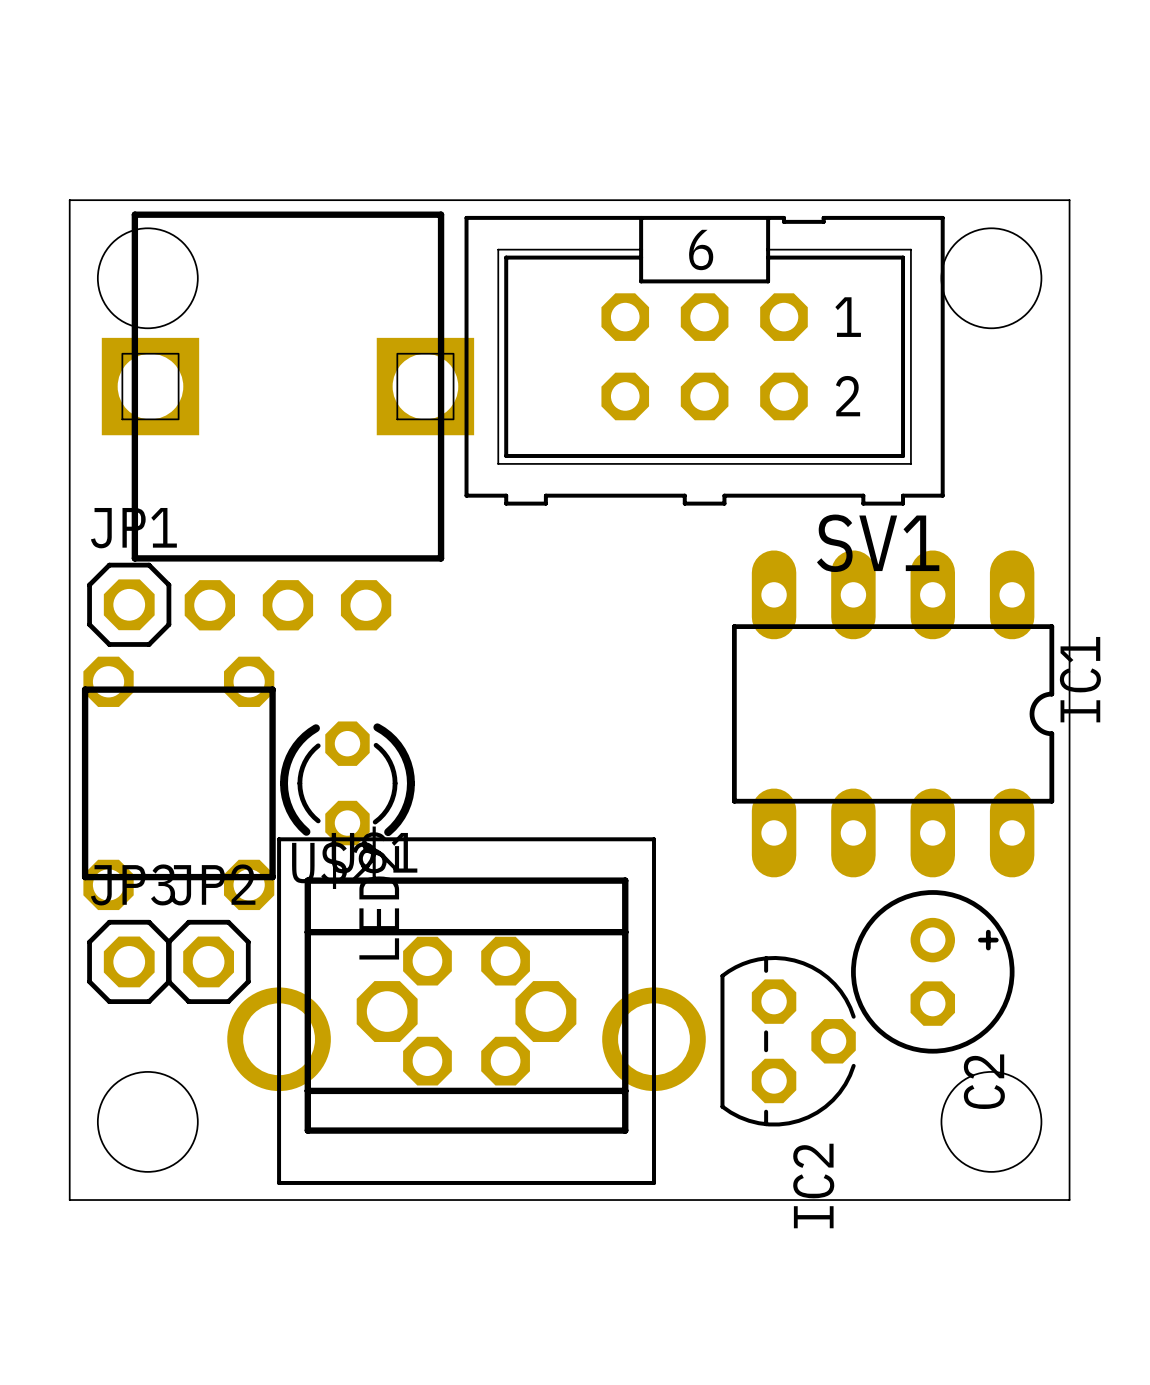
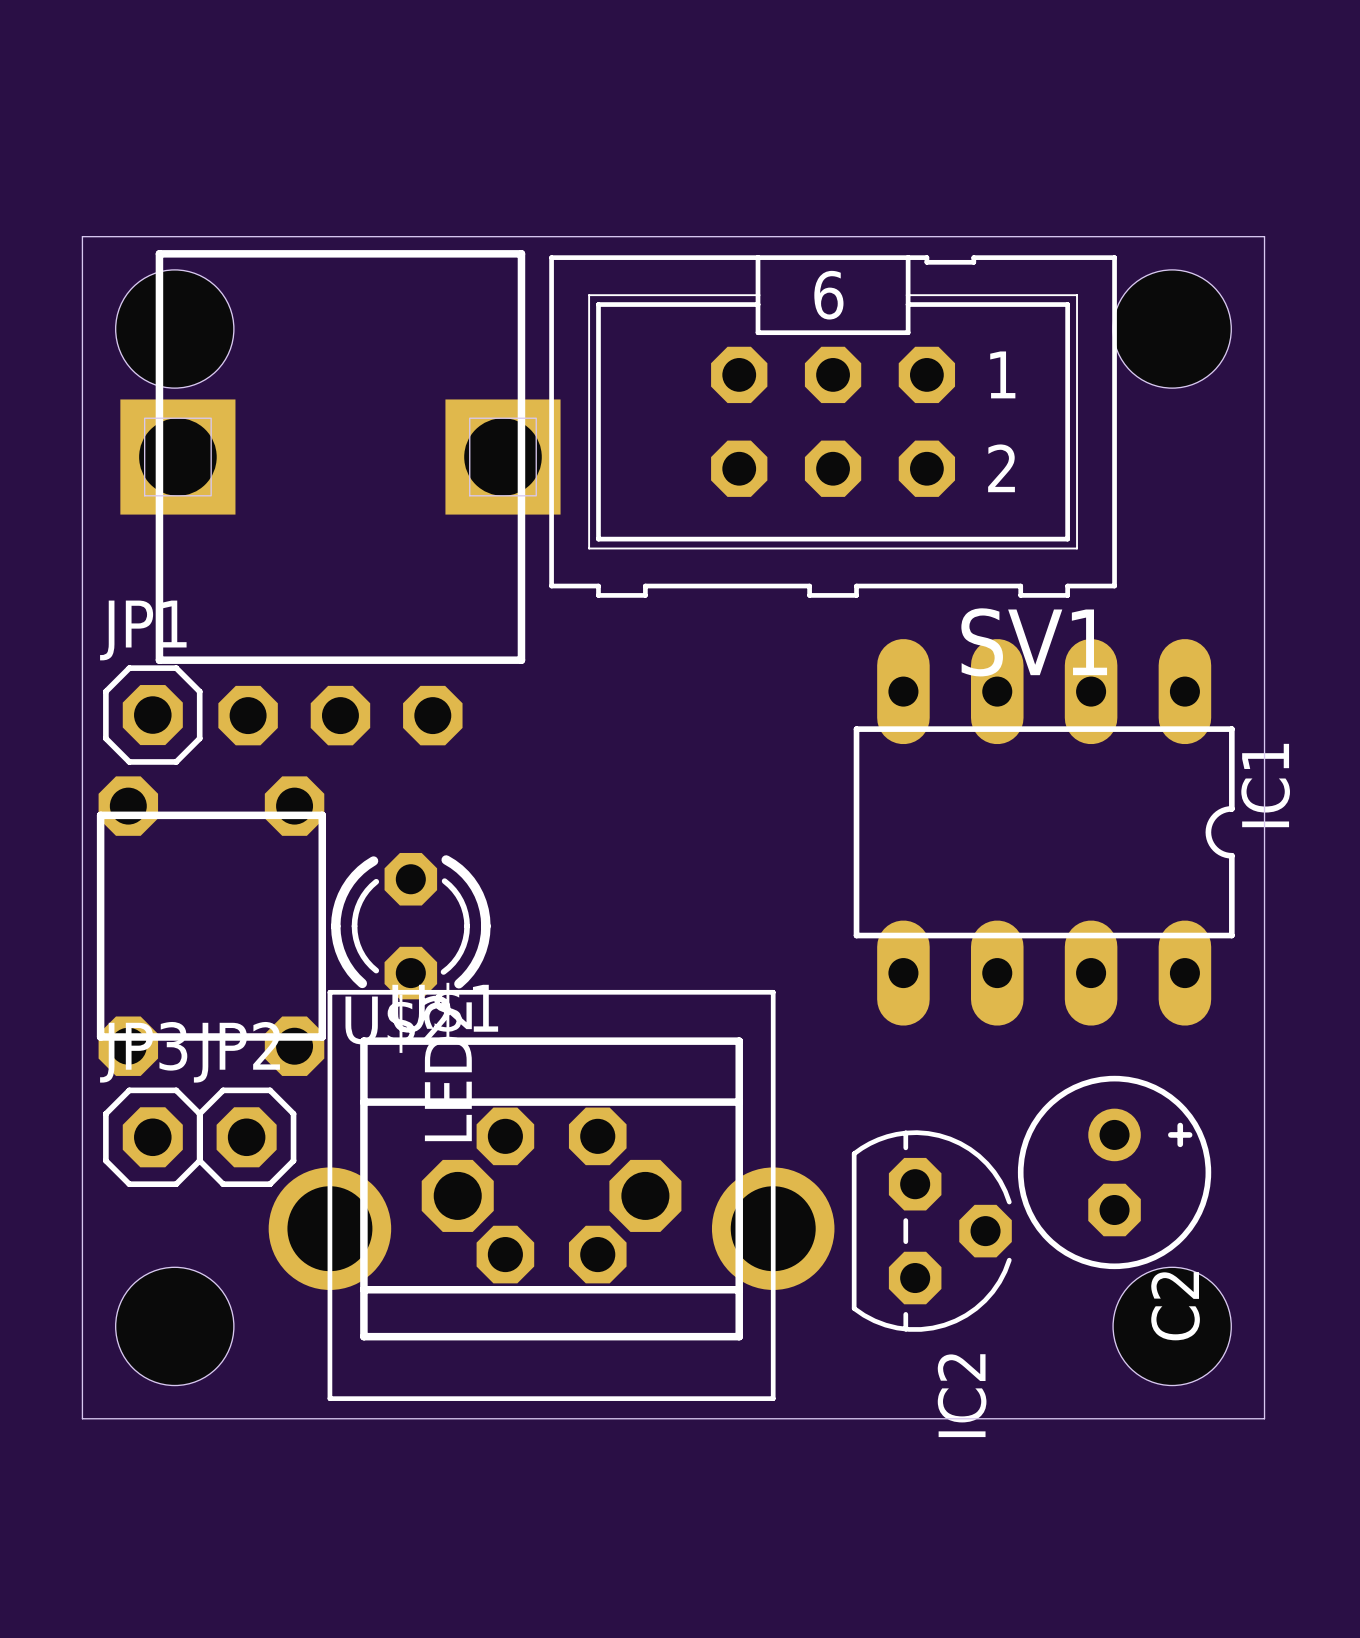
IC1 position: (893, 713) -> (1044, 832)
C2 position: (932, 971) -> (1114, 1172)

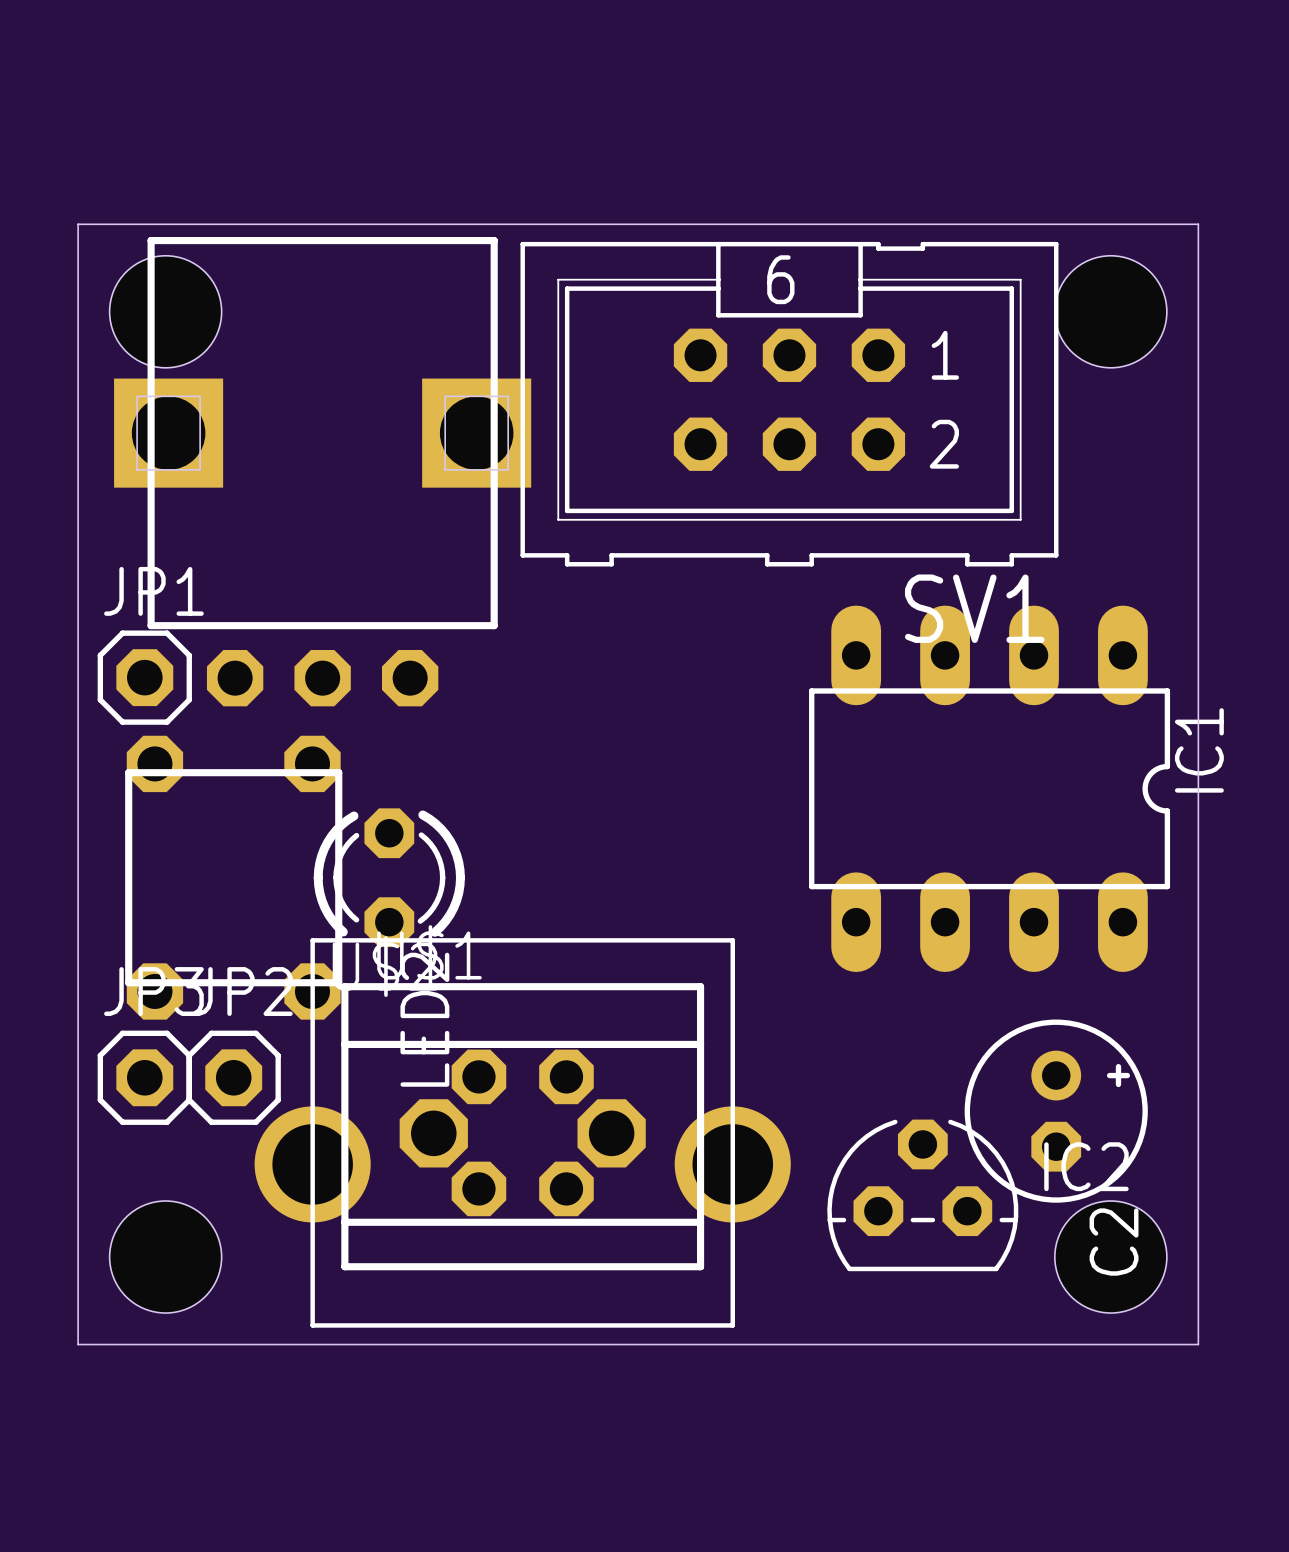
part position: (211, 926) -> (233, 877)
IC2 rotation: 0° (931, 1231) -> 90° counterclockwise (922, 1195)

